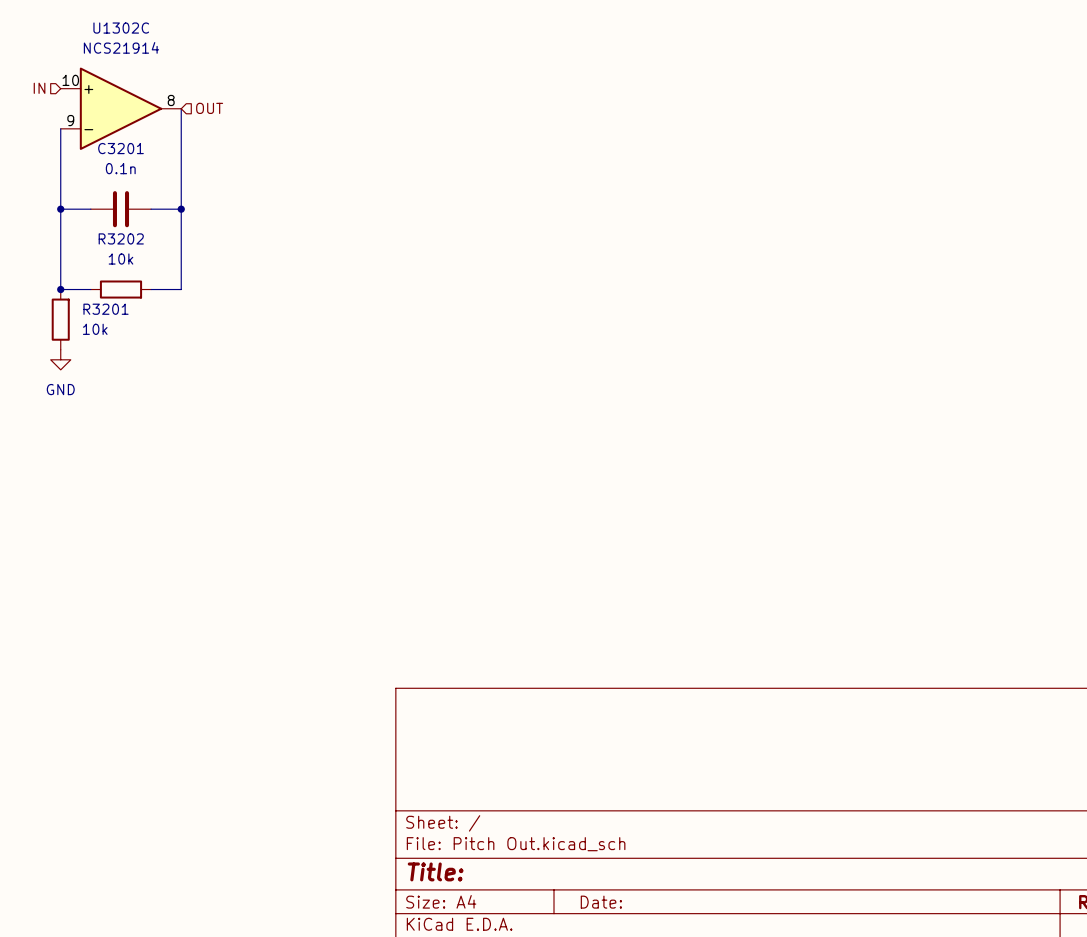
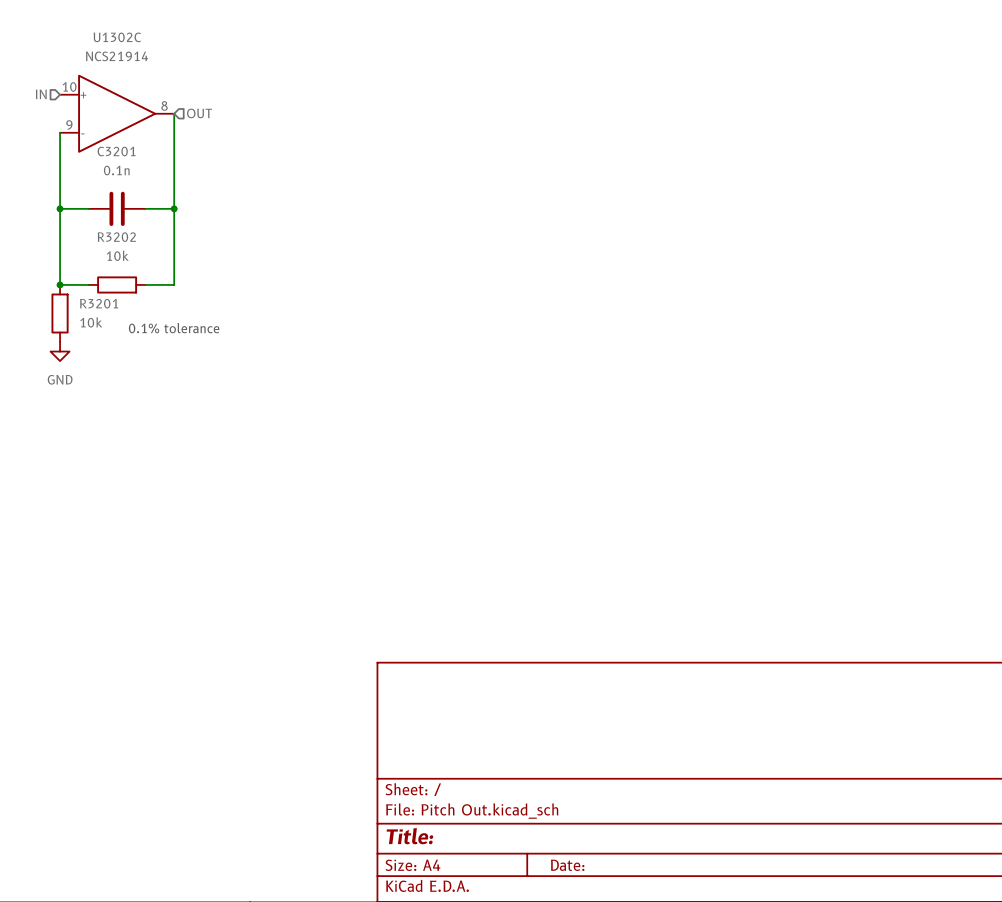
text: none -> 0.1% tolerance (174, 328)

